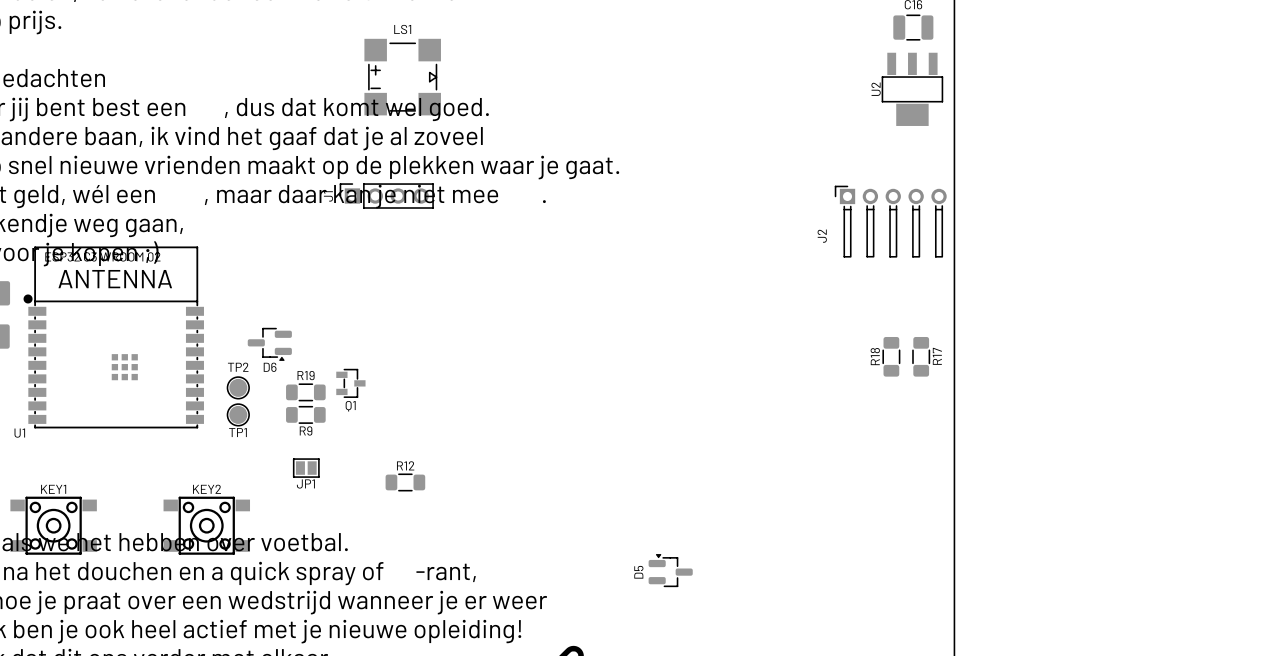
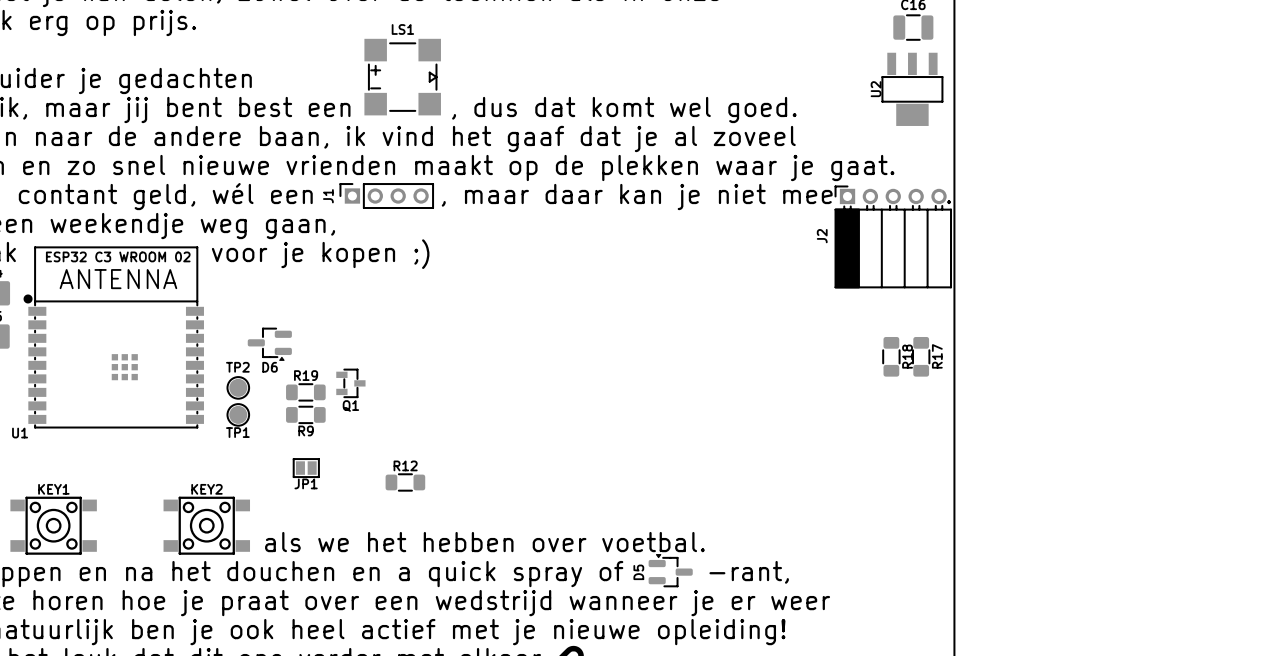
J2 footprint: [834, 185, 947, 258] -> [834, 185, 952, 288]
R18 name position: R18 (875, 356) -> R18 (907, 356)

